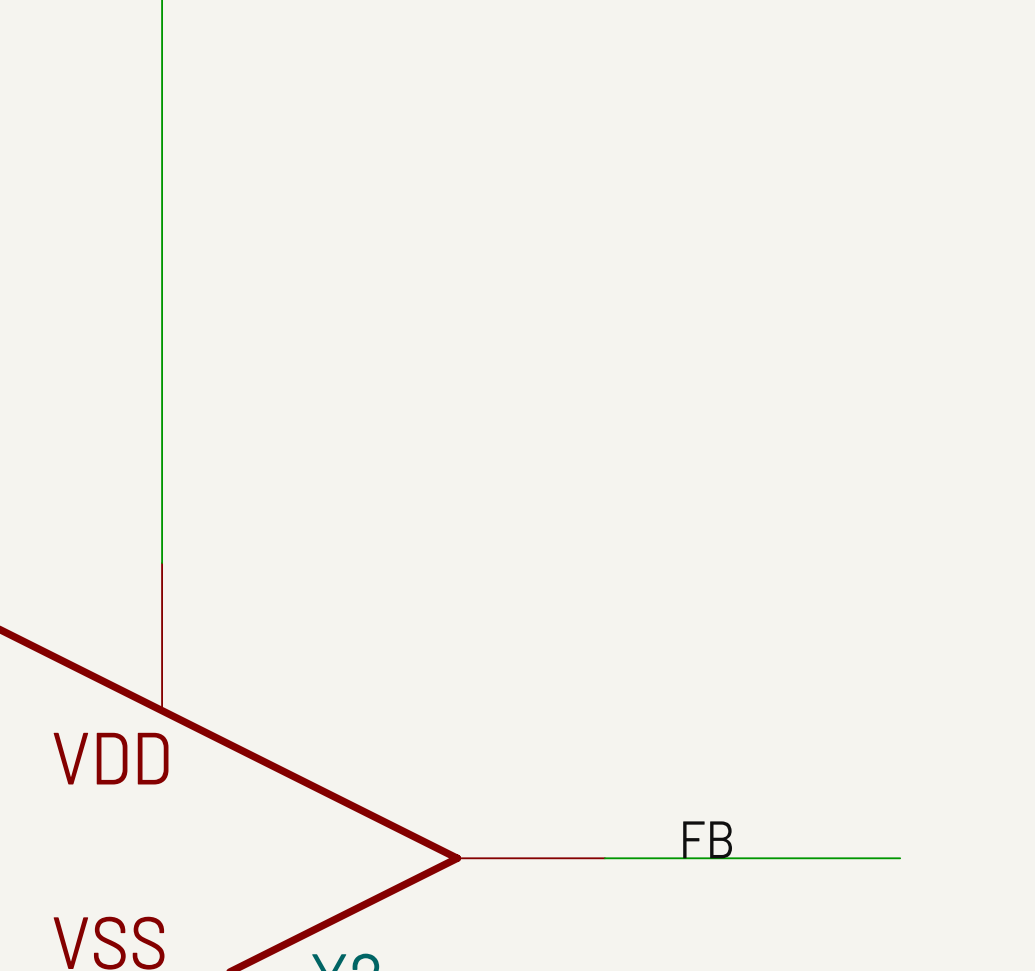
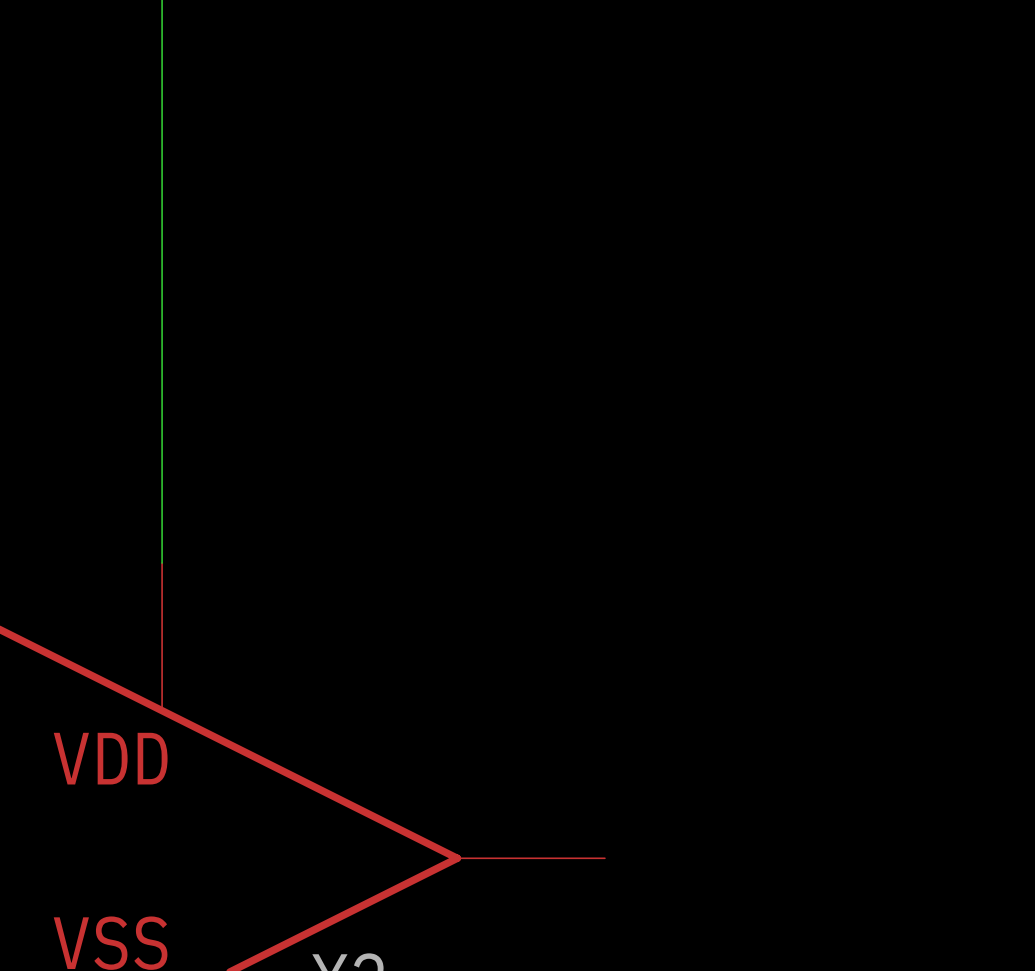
label: FB (707, 839) -> none
wire: (604, 858) (900, 858) -> none

